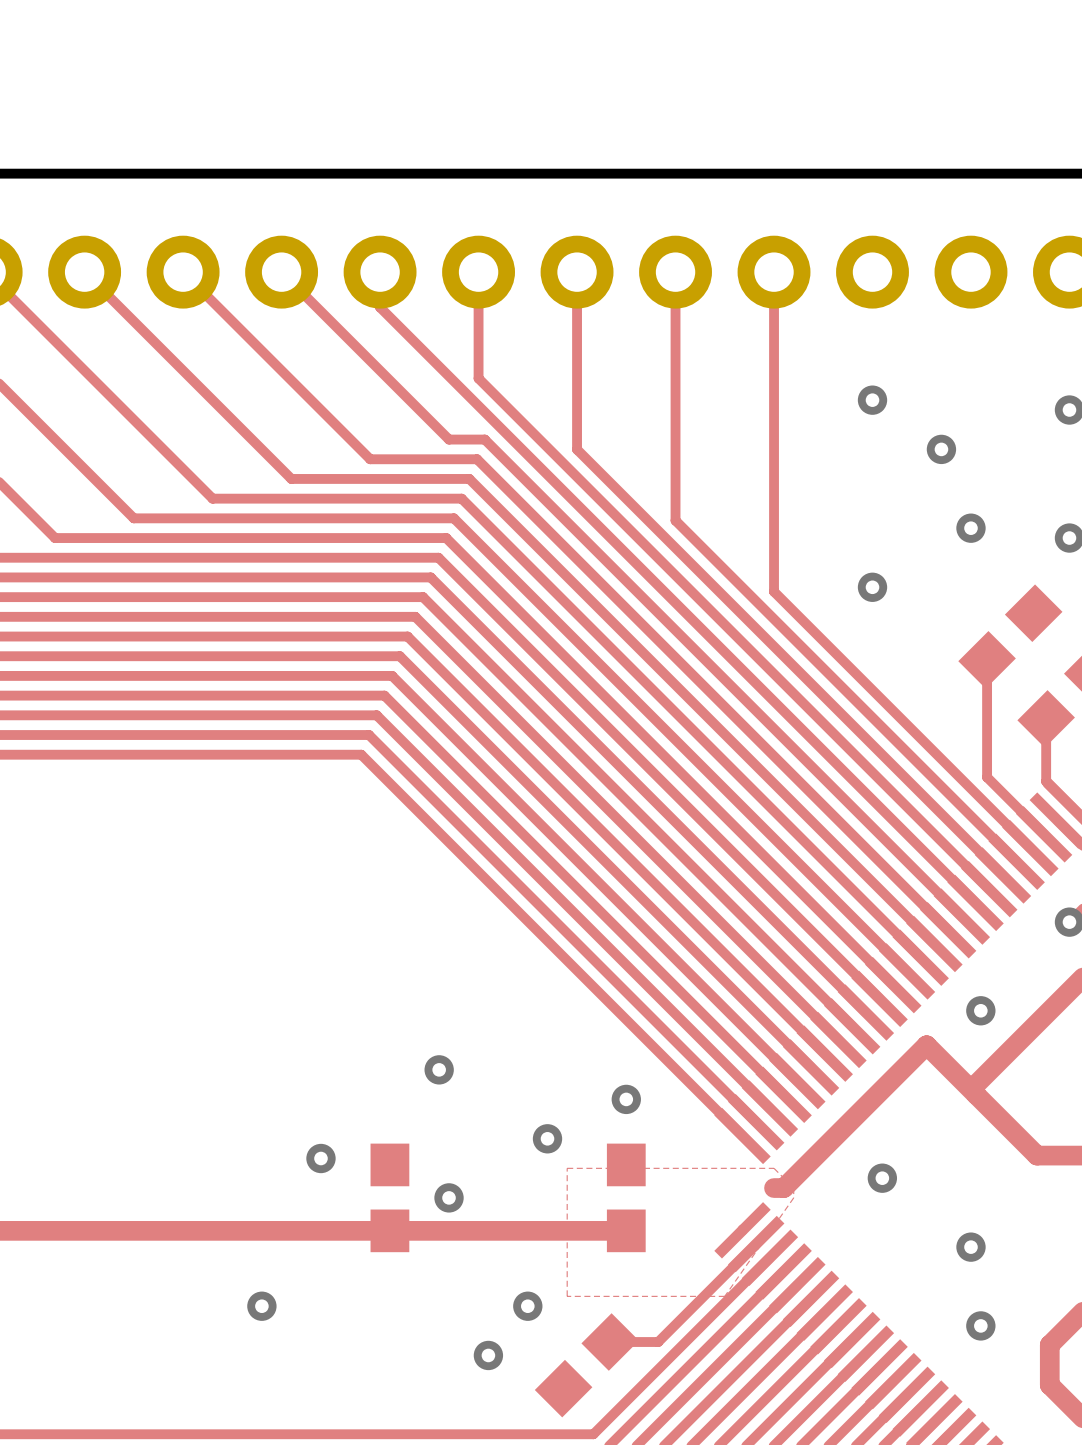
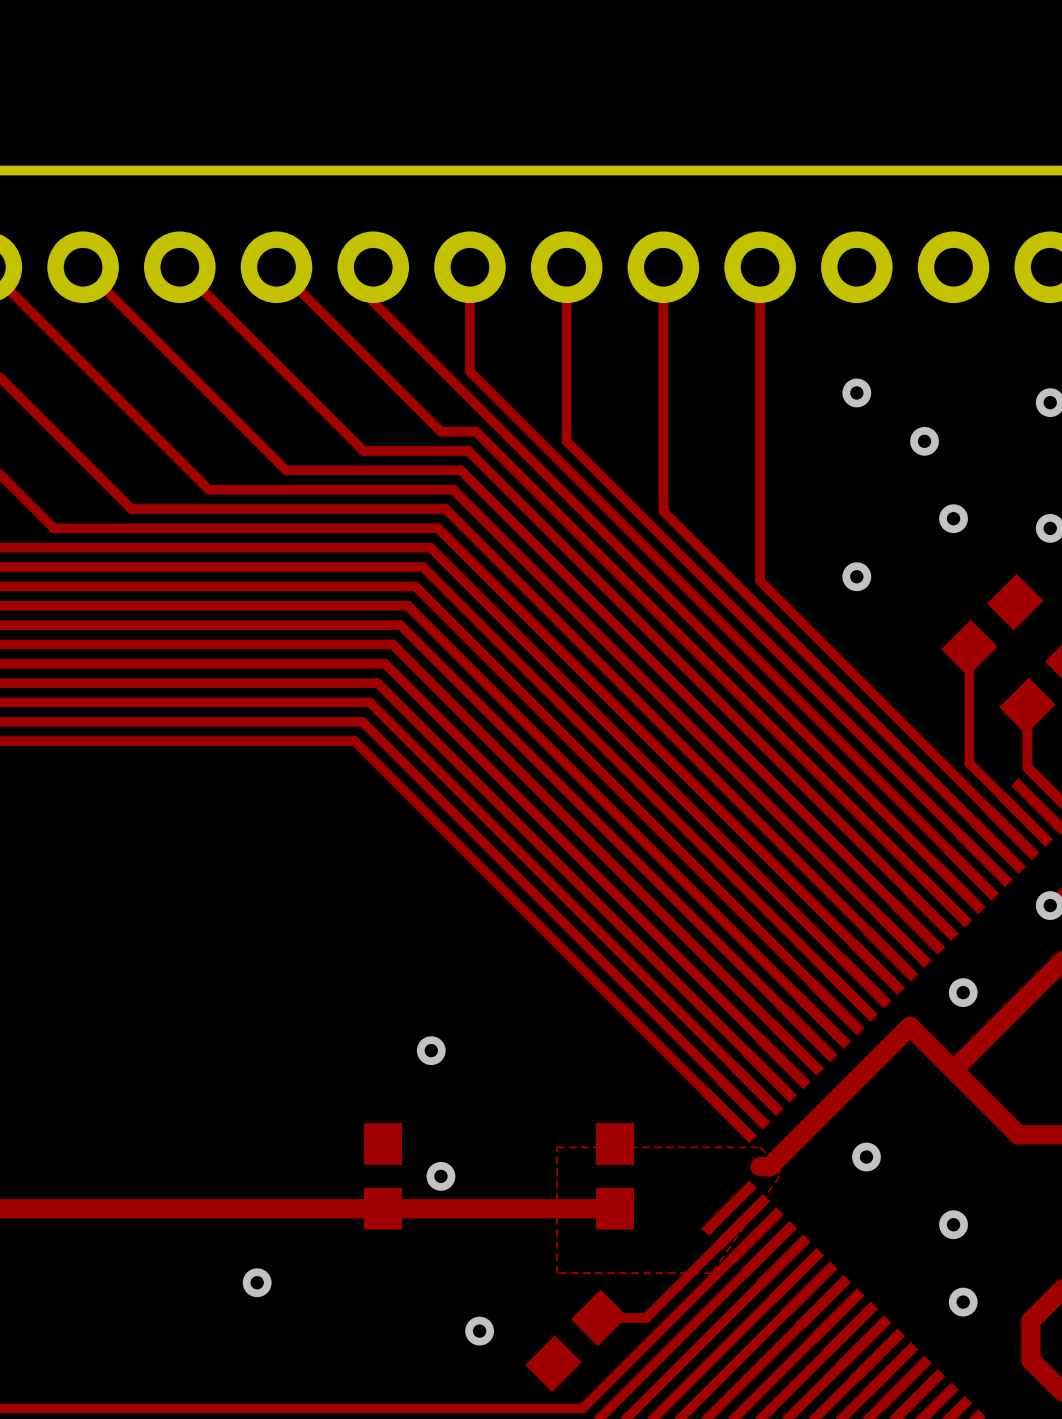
via: (626, 1099) -> none
via: (547, 1138) -> none
via: (320, 1158) -> none
via: (527, 1306) -> none

